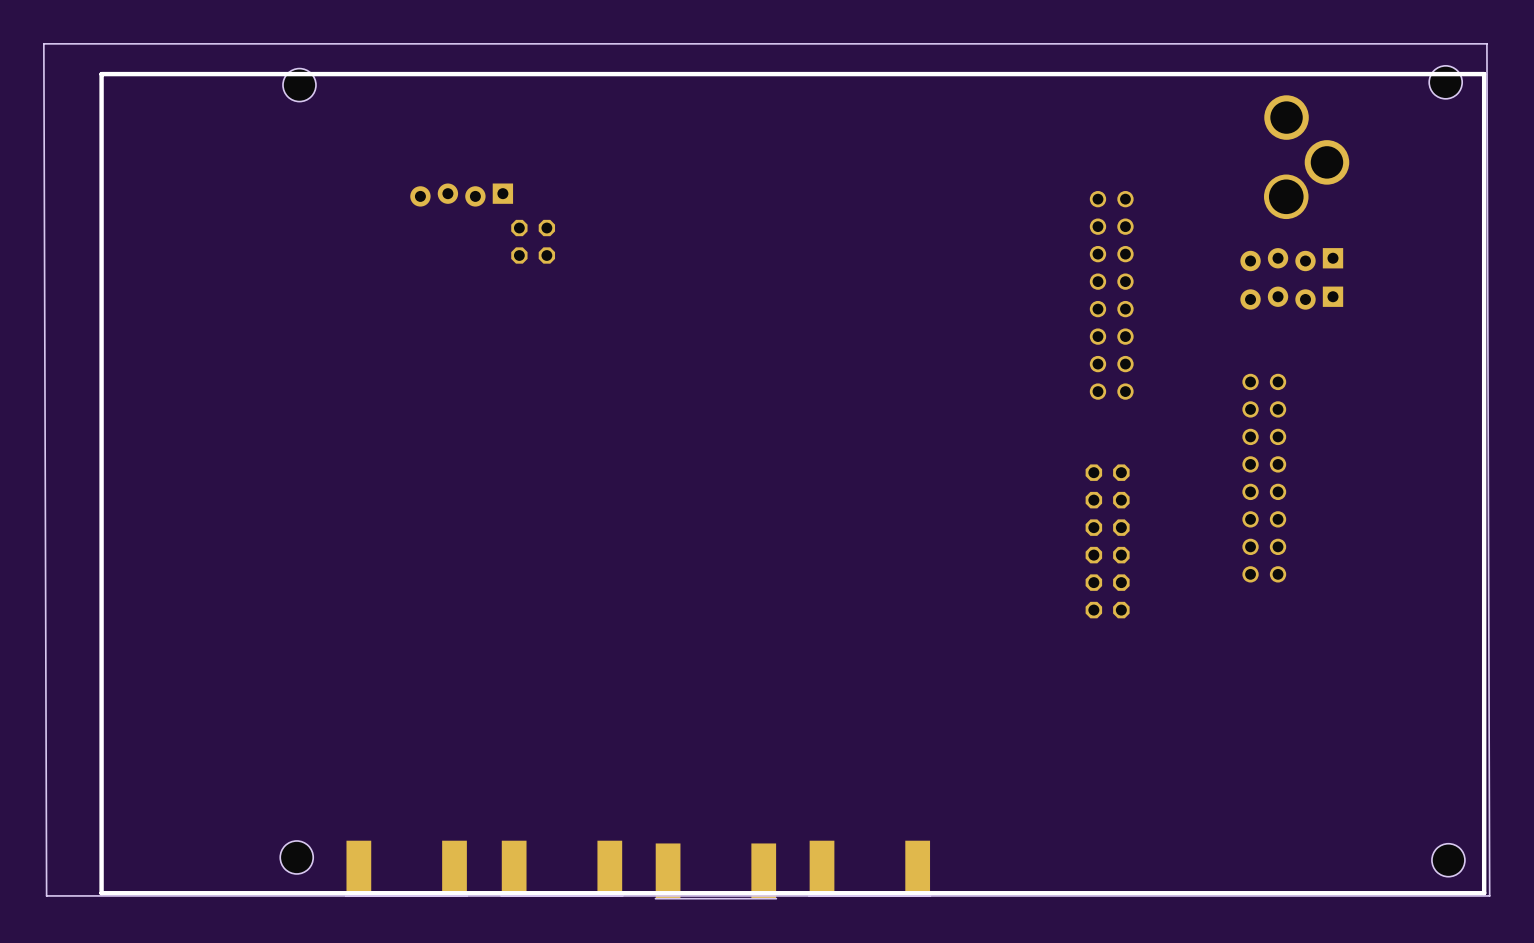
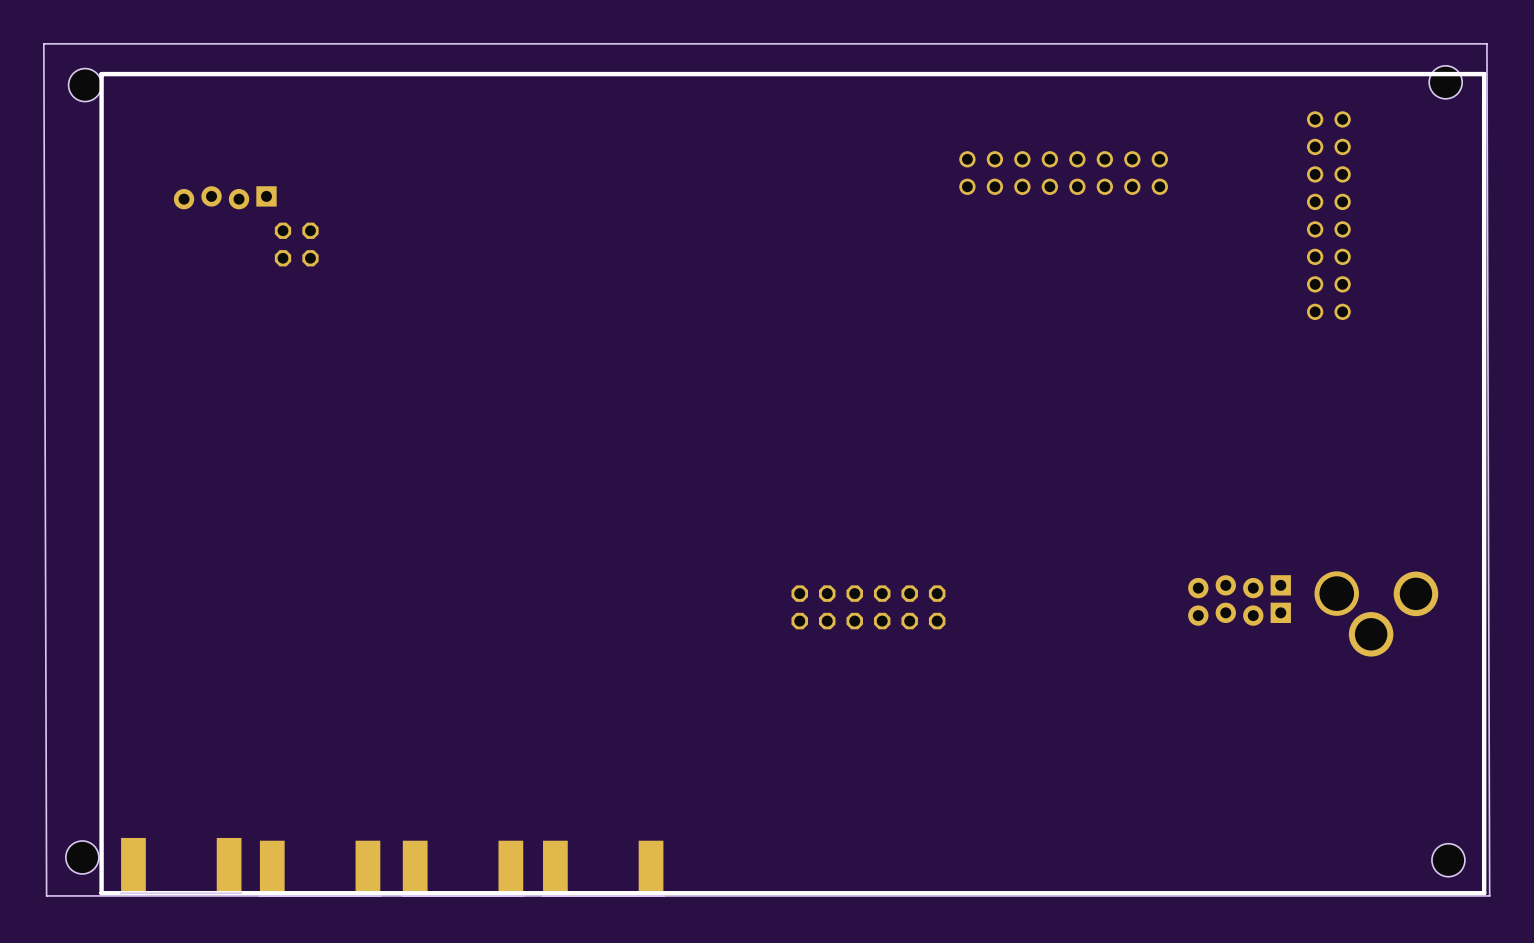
part position: (299, 85) -> (85, 85)
part: (1306, 157) -> none
part: none -> (1063, 173)
part position: (461, 195) -> (225, 197)
part: none -> (1328, 215)
part position: (533, 241) -> (296, 244)
part: (1291, 259) -> none
part: (1111, 295) -> none
part: (1291, 298) -> none
part: (1264, 478) -> none
part rotation: 0° (1107, 541) -> 90° clockwise (868, 607)
part position: (1107, 541) -> (868, 607)
part: none -> (1239, 586)
part: none -> (1376, 613)
part: none -> (1239, 614)
part position: (296, 857) -> (82, 857)
part: none -> (181, 865)
part: none -> (320, 868)
part: (406, 868) -> none
part: none -> (463, 868)
part position: (561, 868) -> (603, 868)
part: (869, 868) -> none
part: (715, 871) -> none

